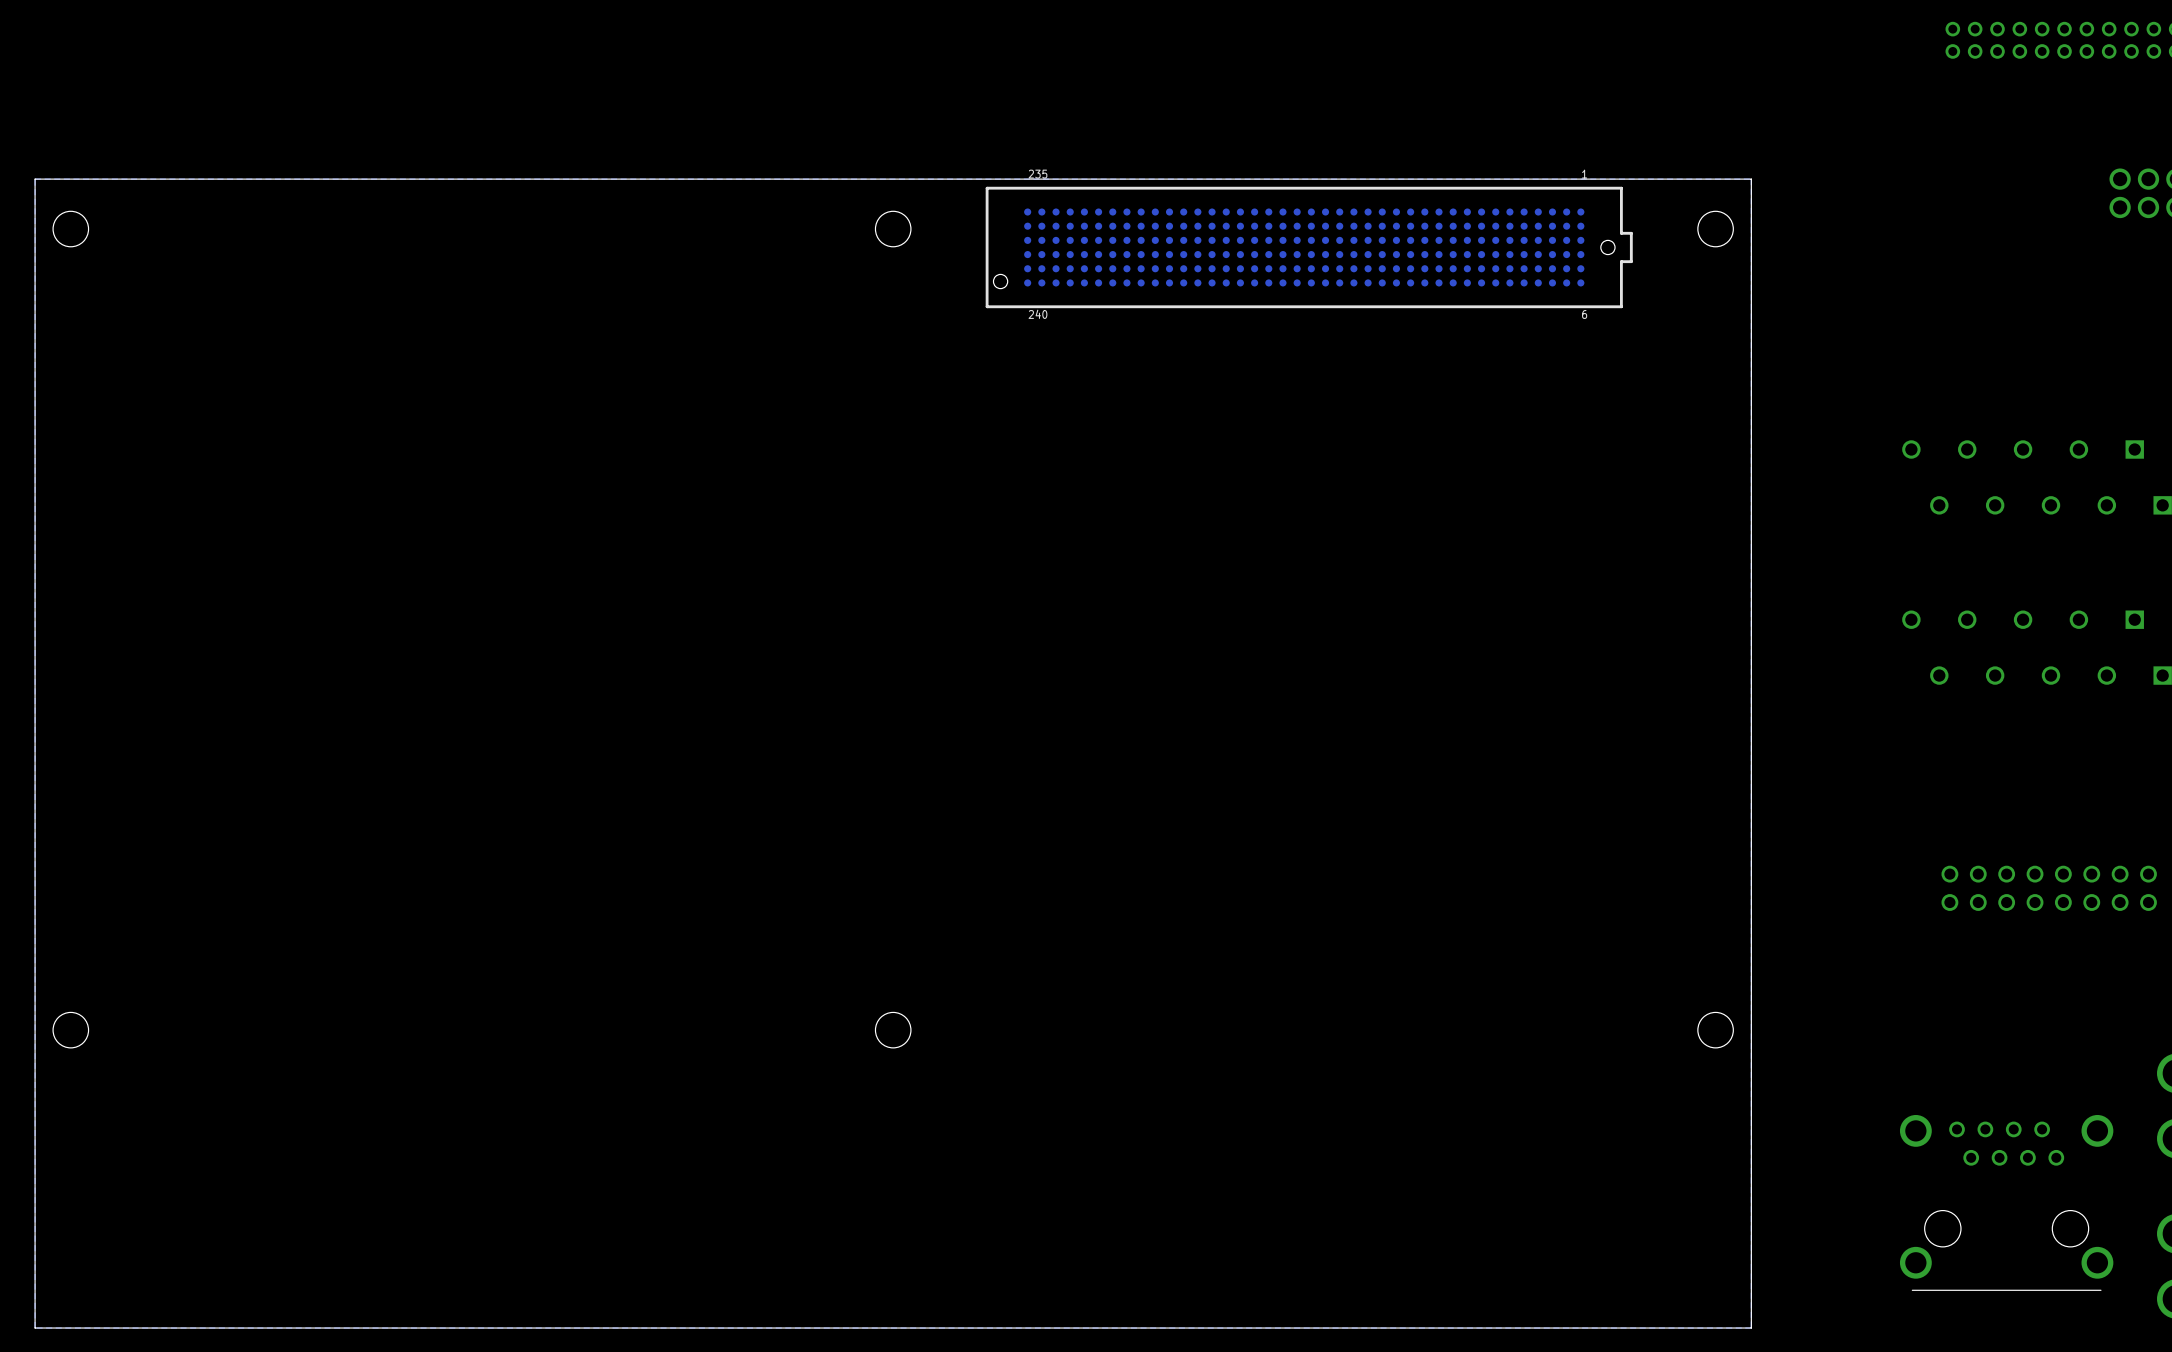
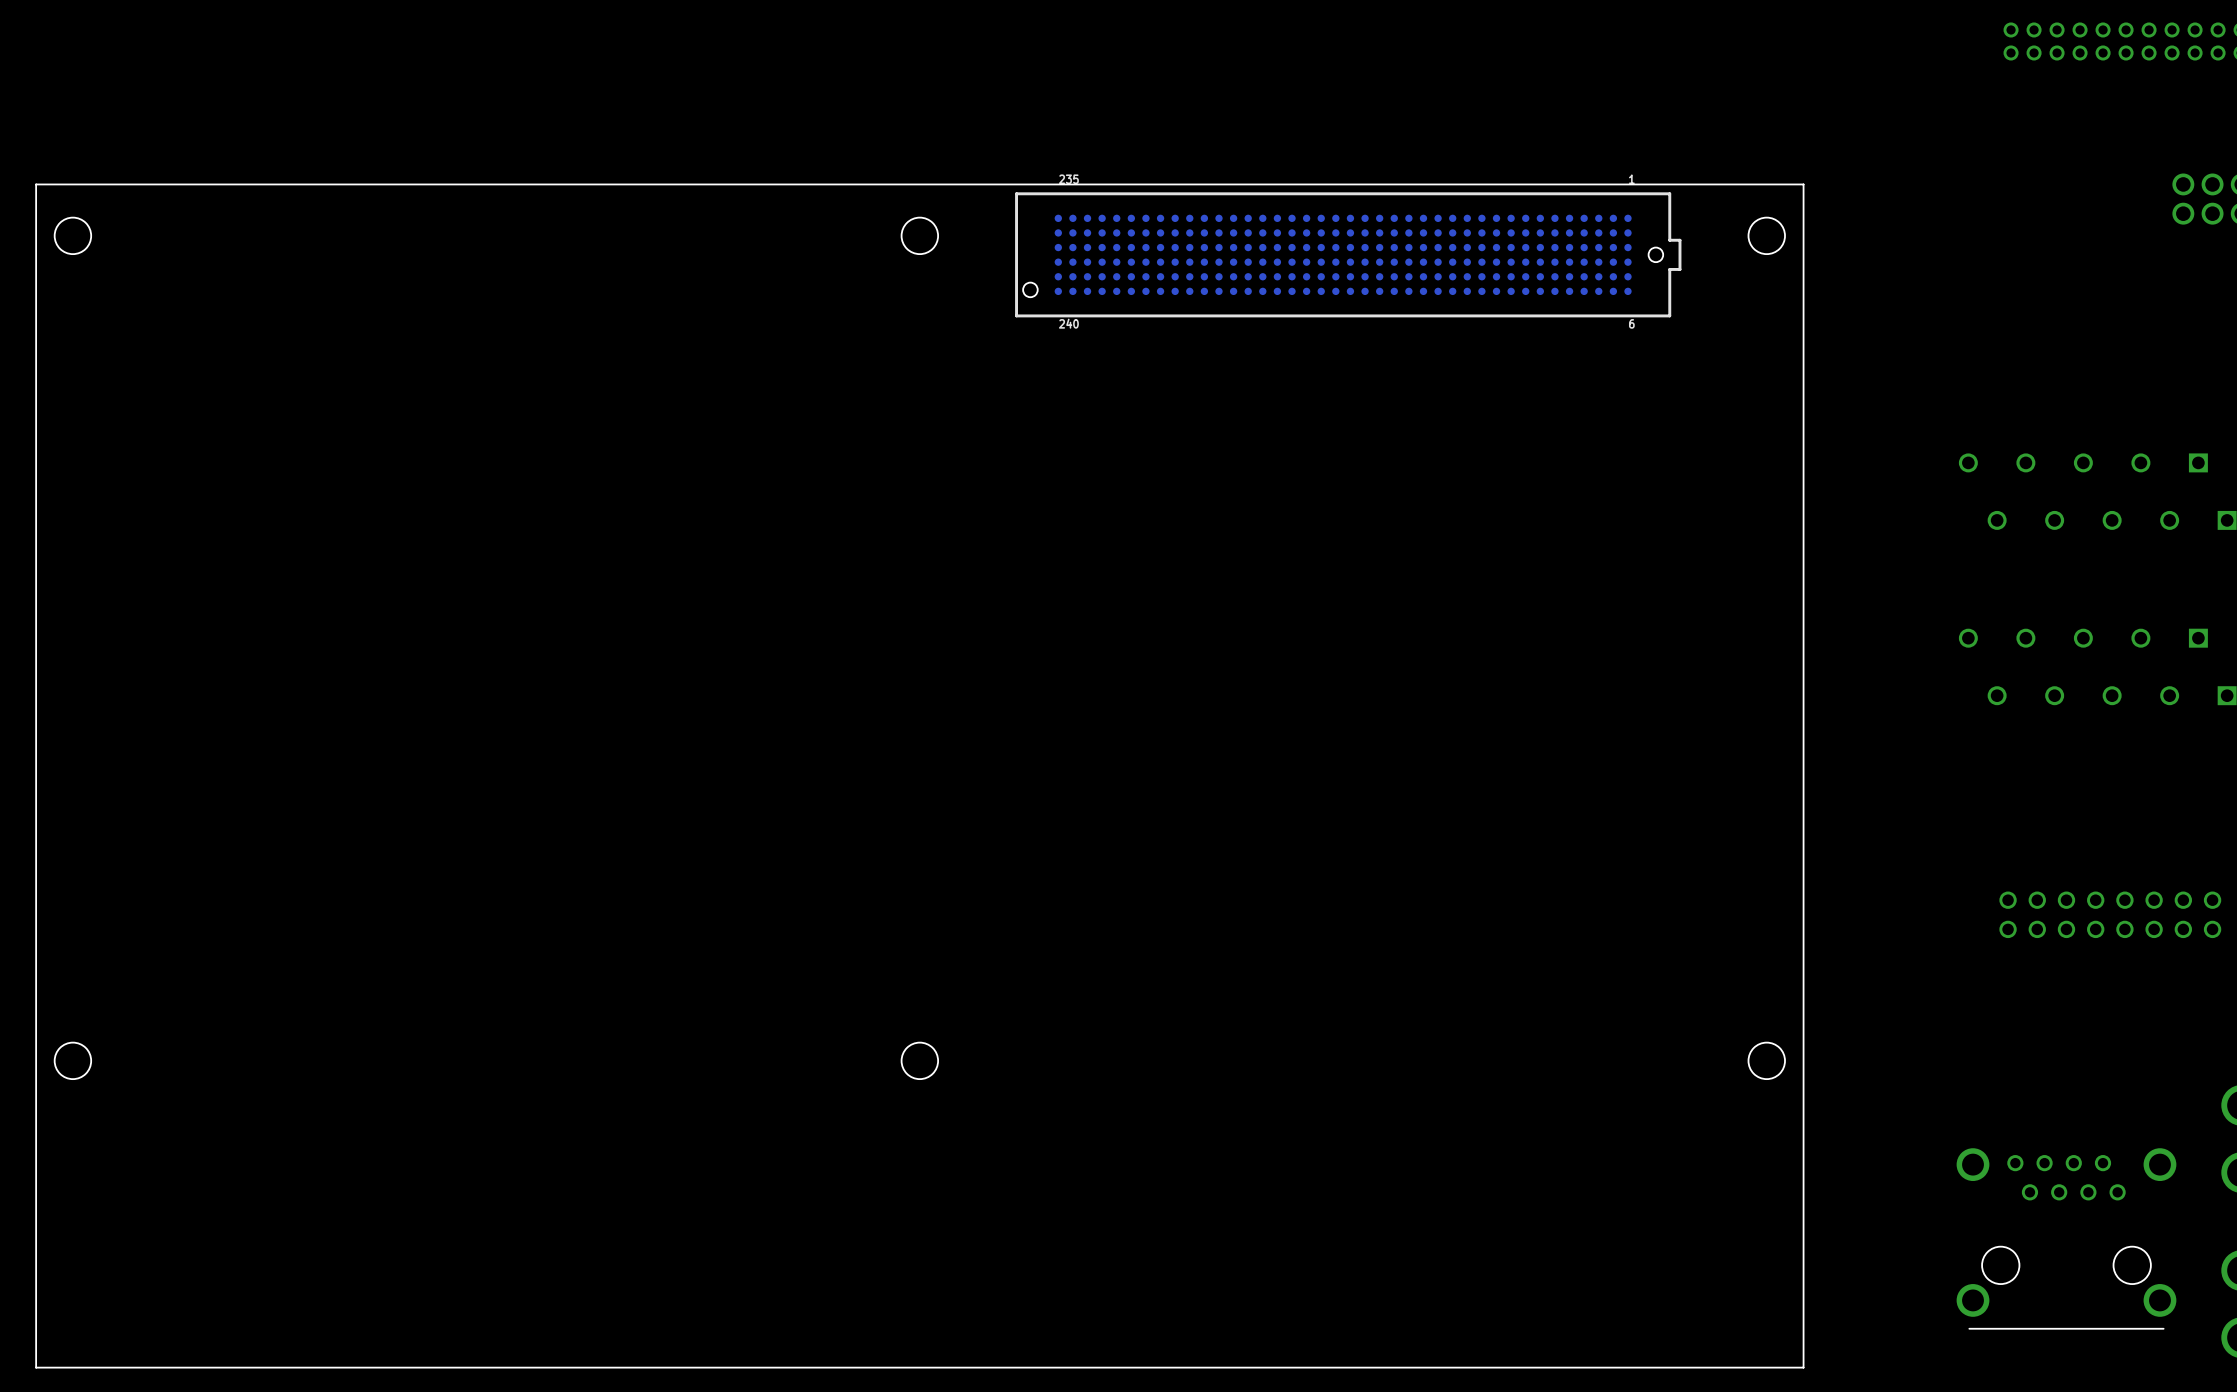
zone outline: (1751, 179) (35, 179) (35, 1328) (1751, 1328) (1751, 179) -> none

